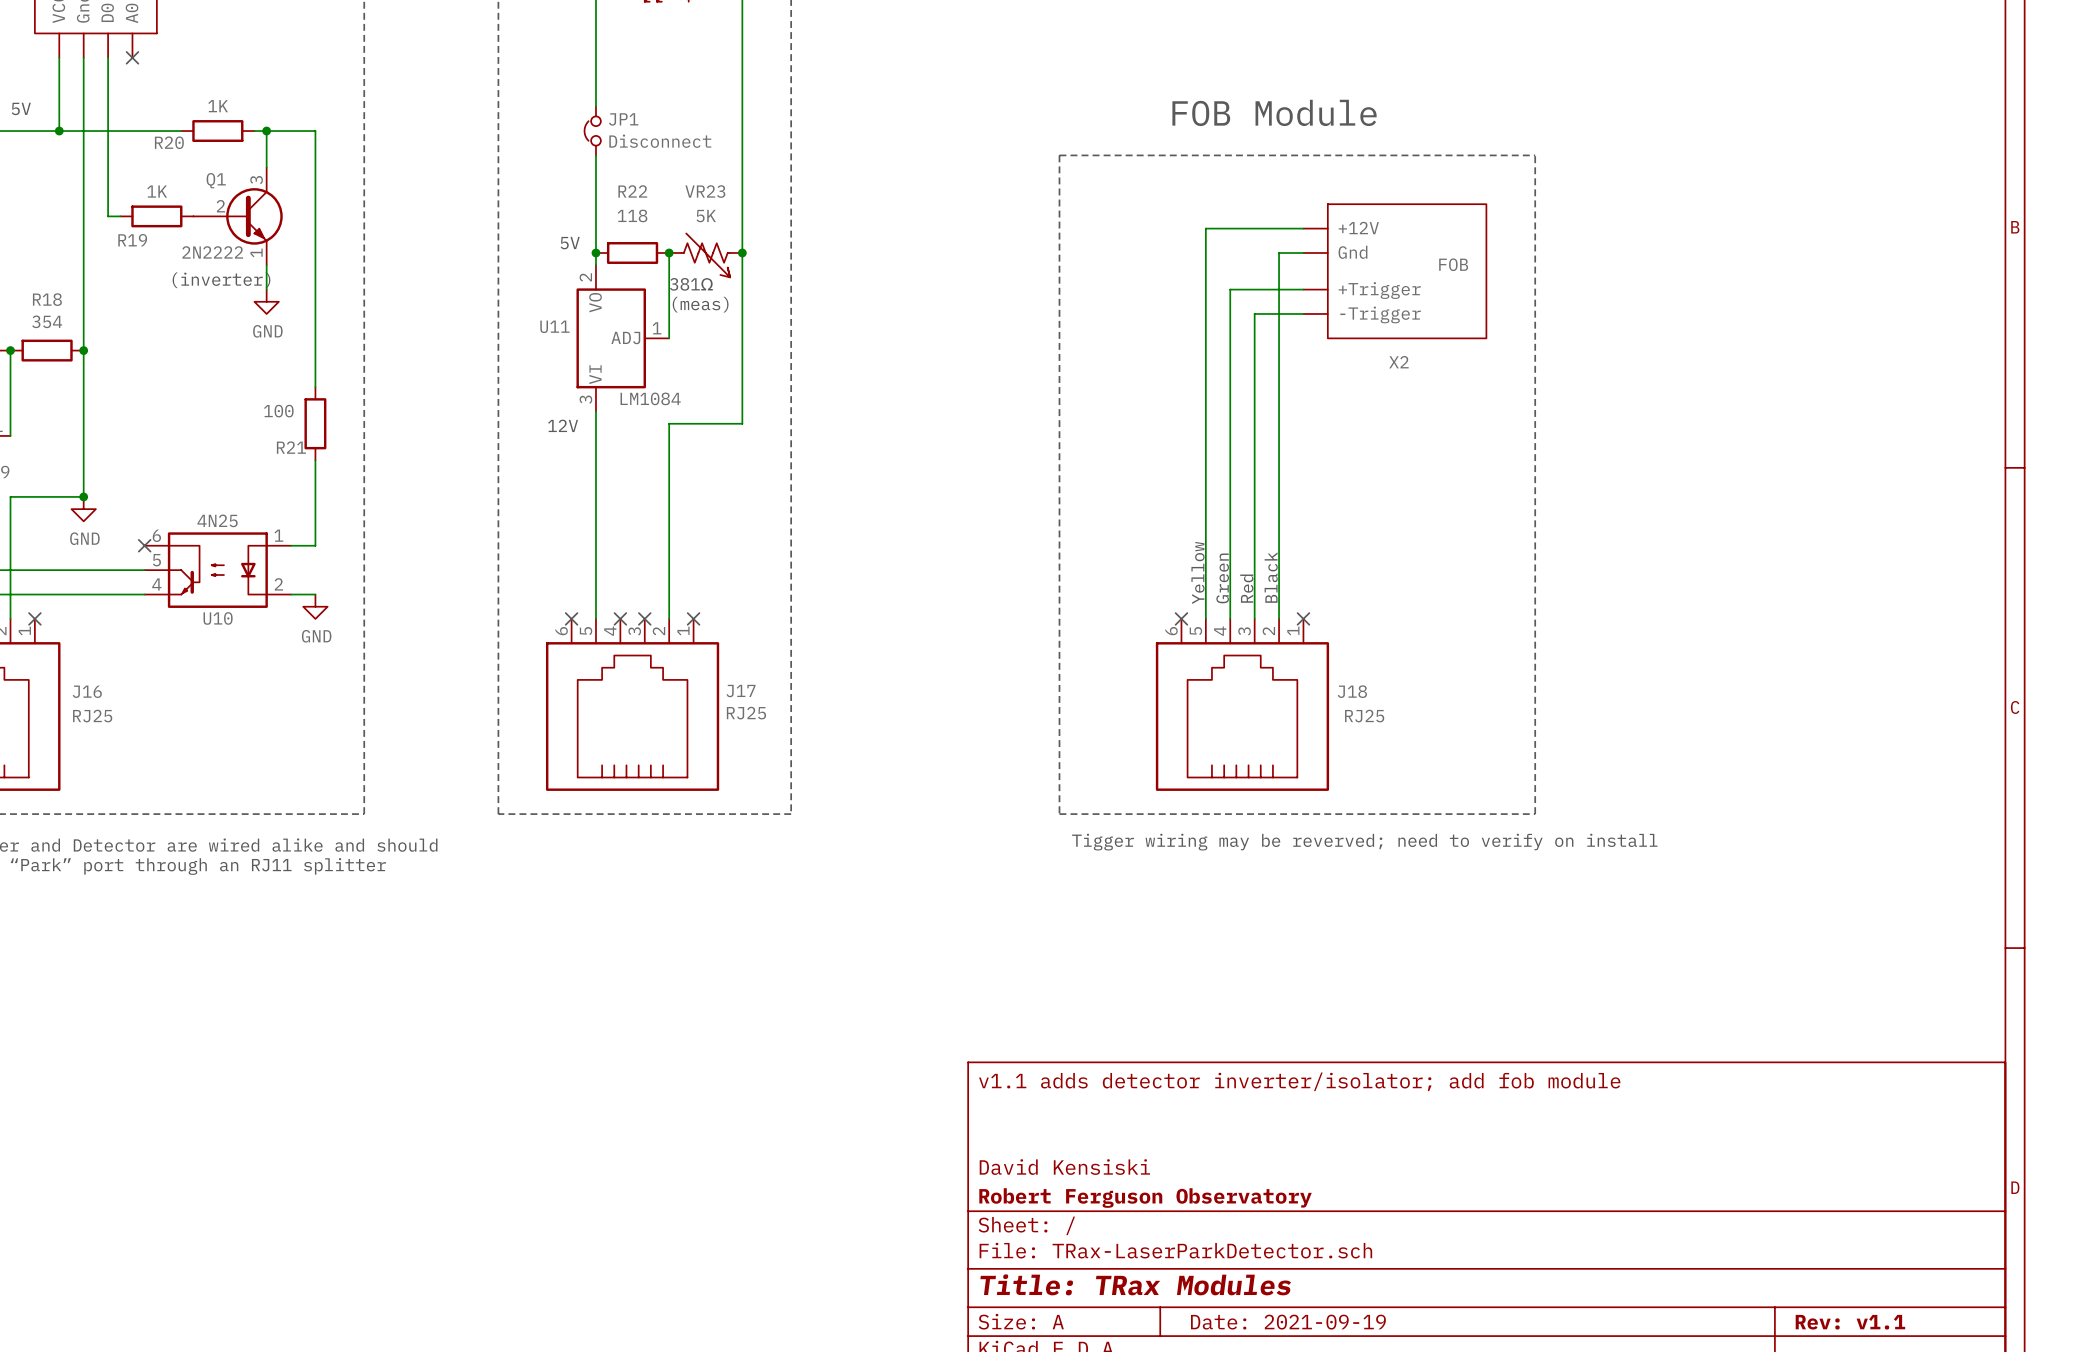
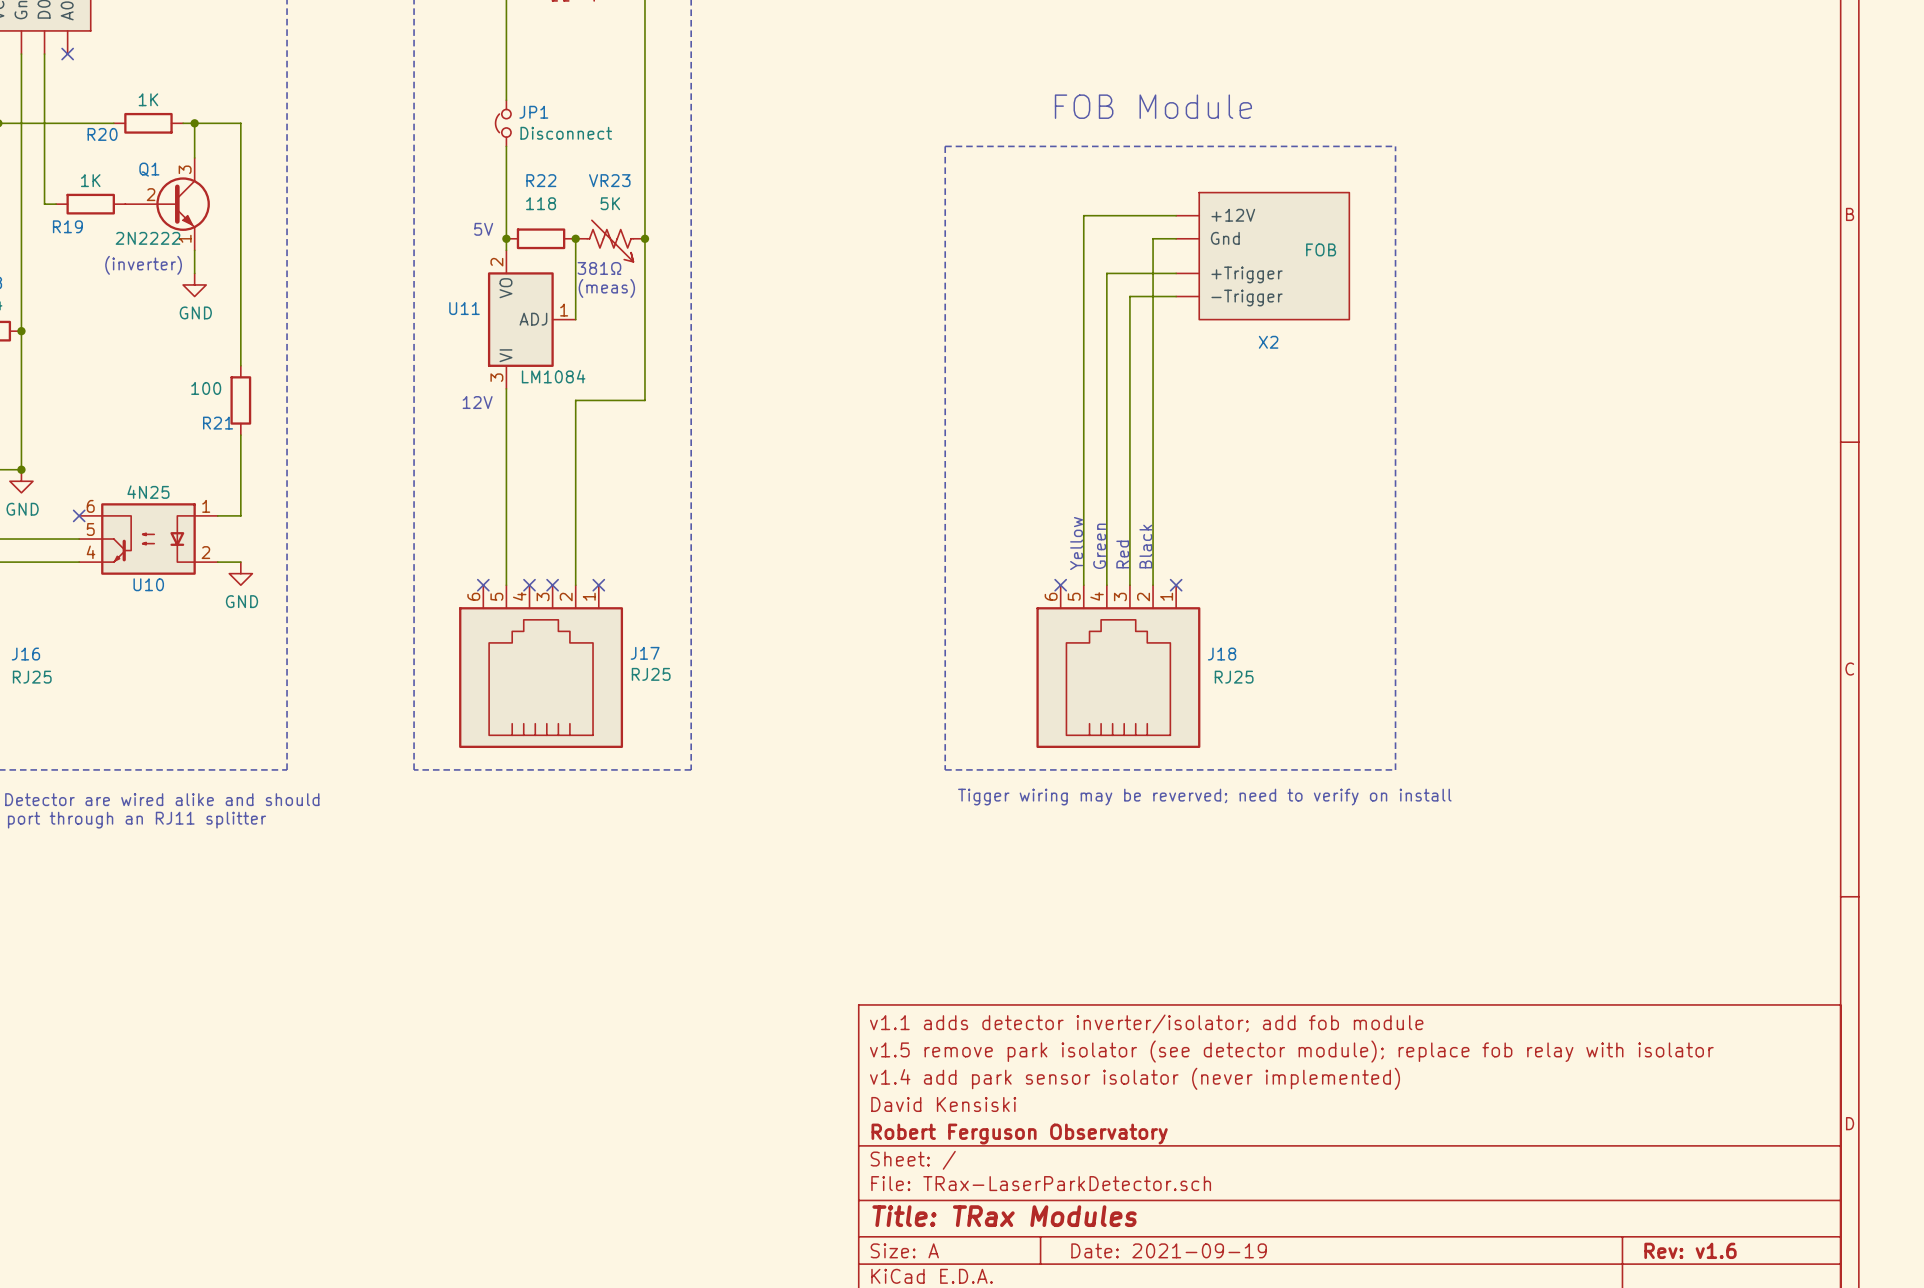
title block: none -> v1.5 remove park isolator (see detector module); replace fob relay with isolator (1291, 1051)
title block: none -> v1.4 add park sensor isolator (never implemented) (1135, 1078)
title block: Rev: v1.1 (1850, 1322) -> Rev: v1.6 (1690, 1250)

